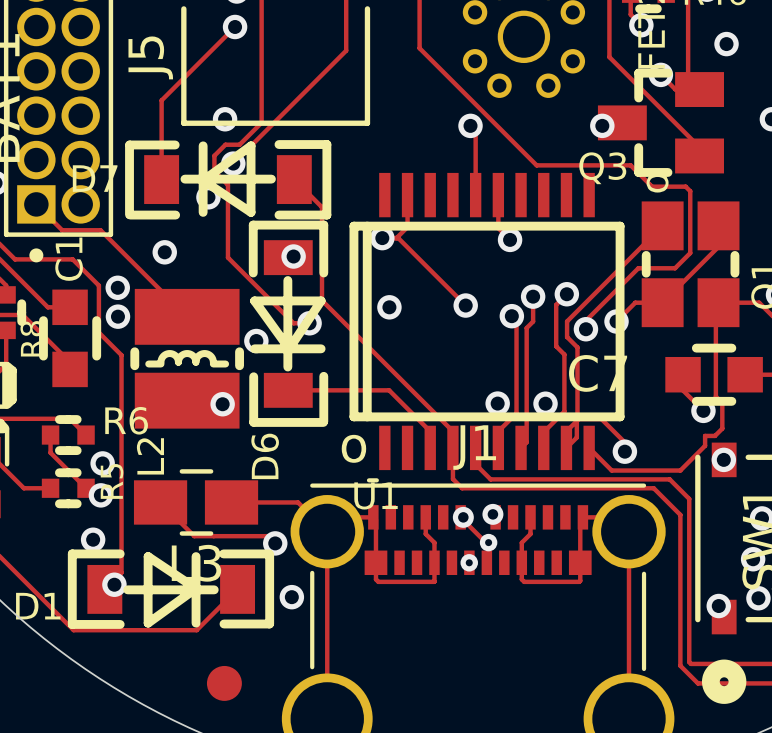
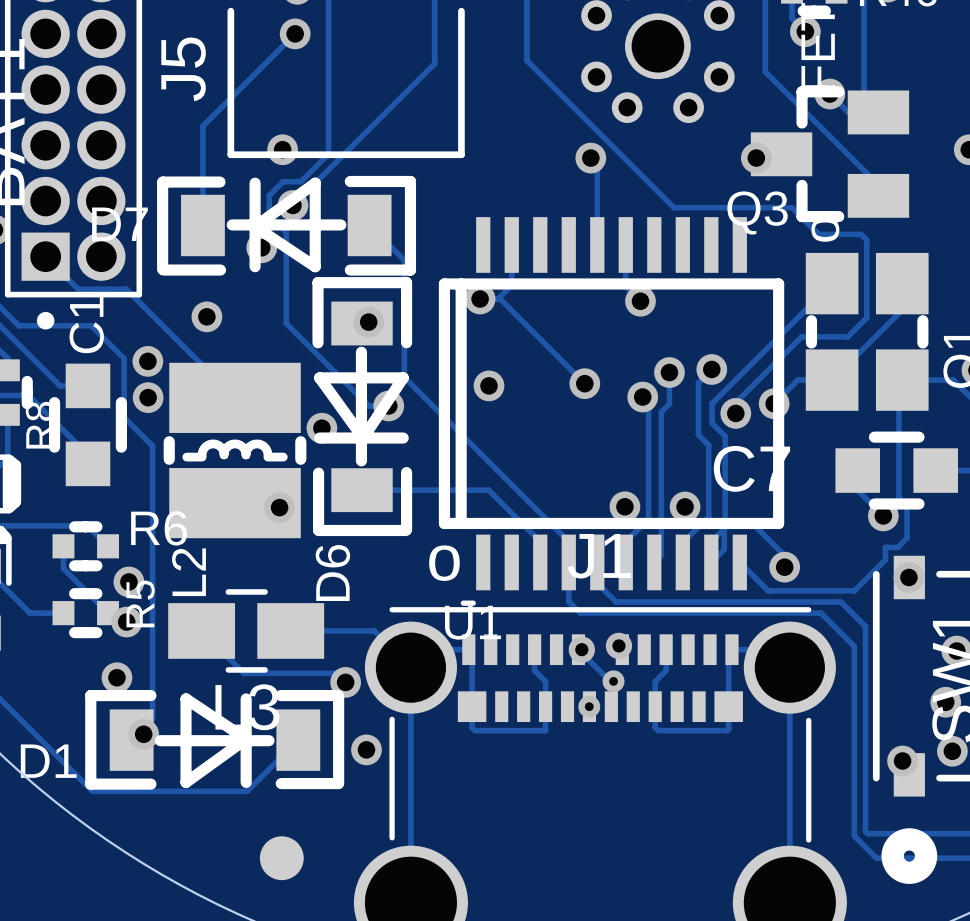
via: (726, 44) -> none

